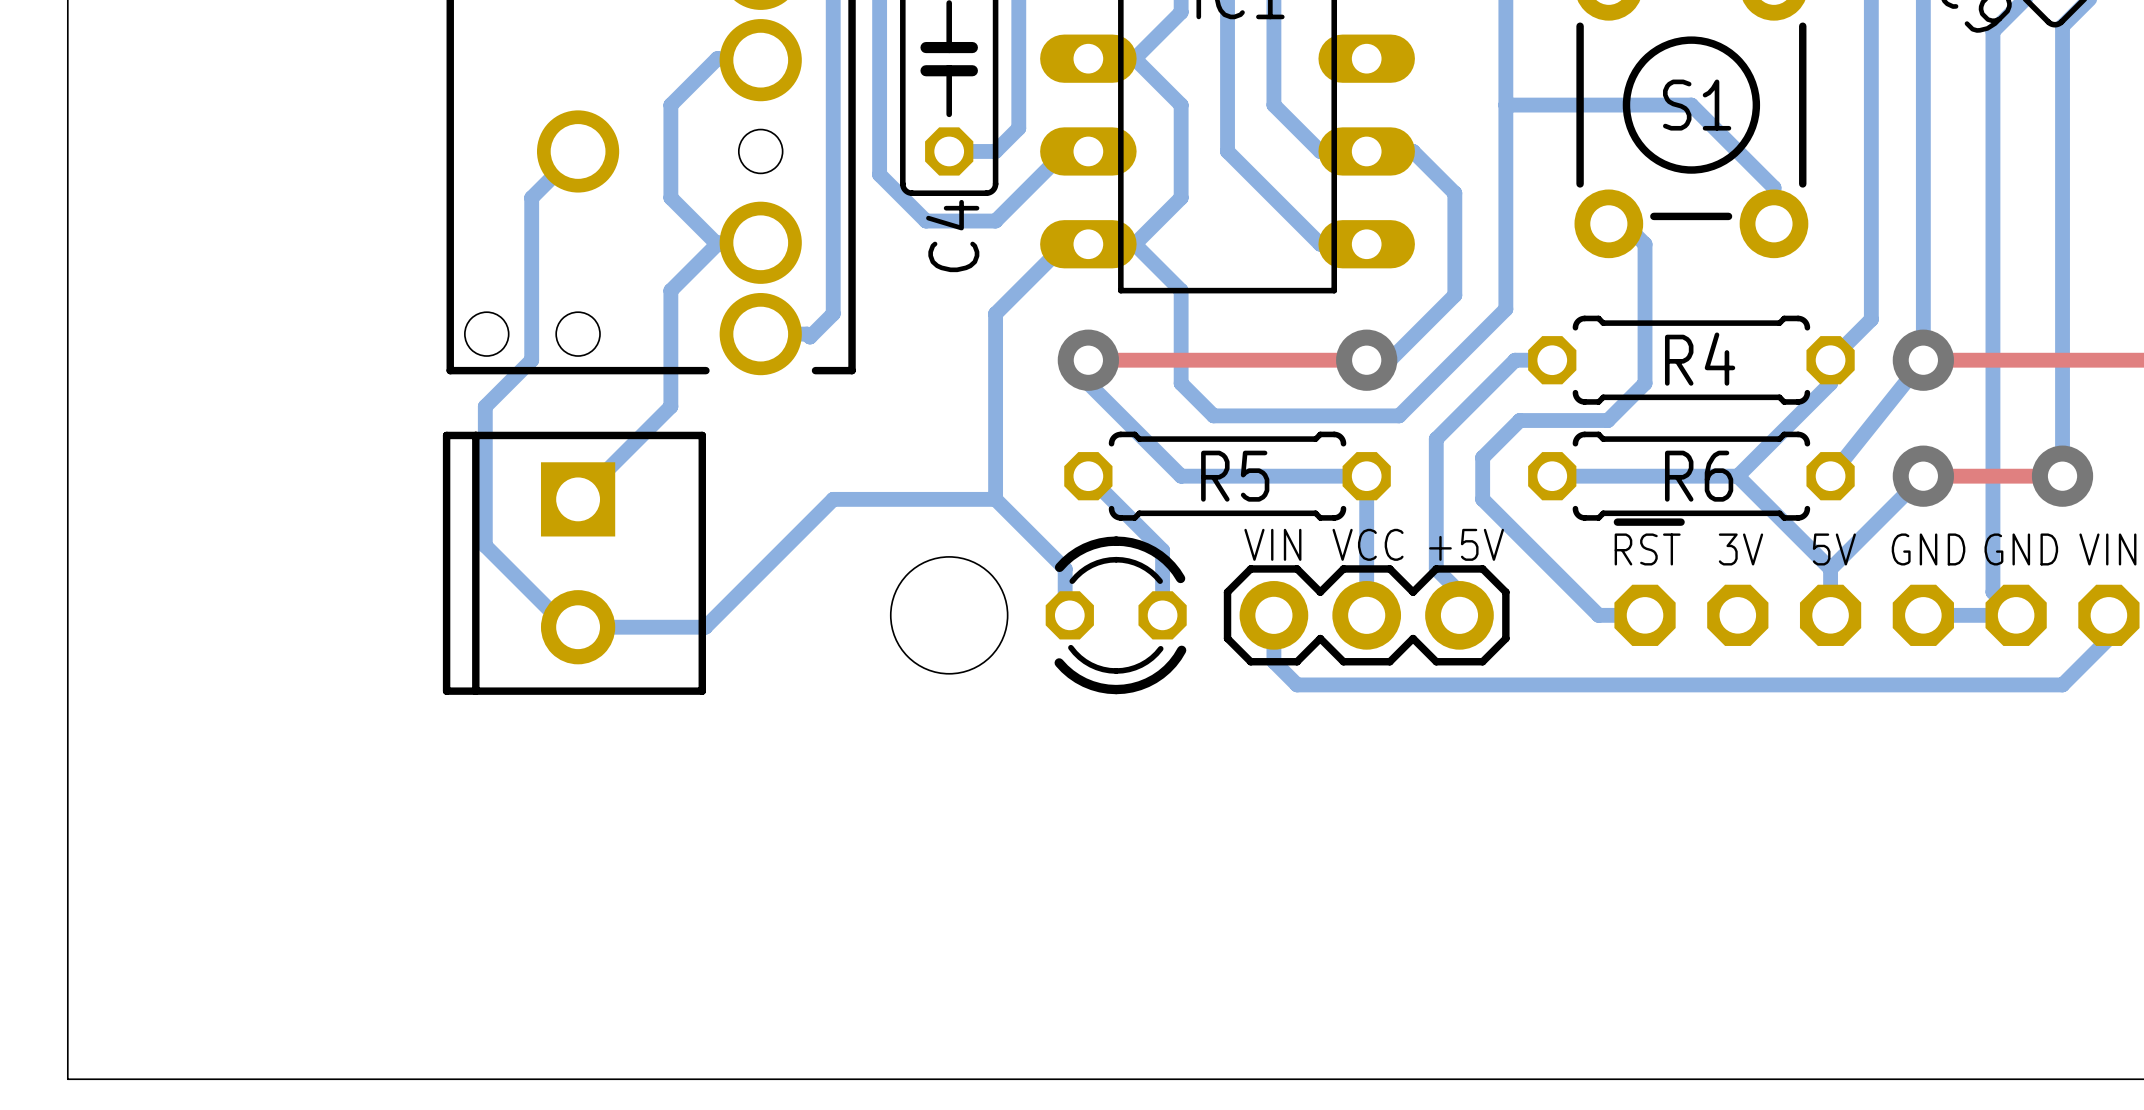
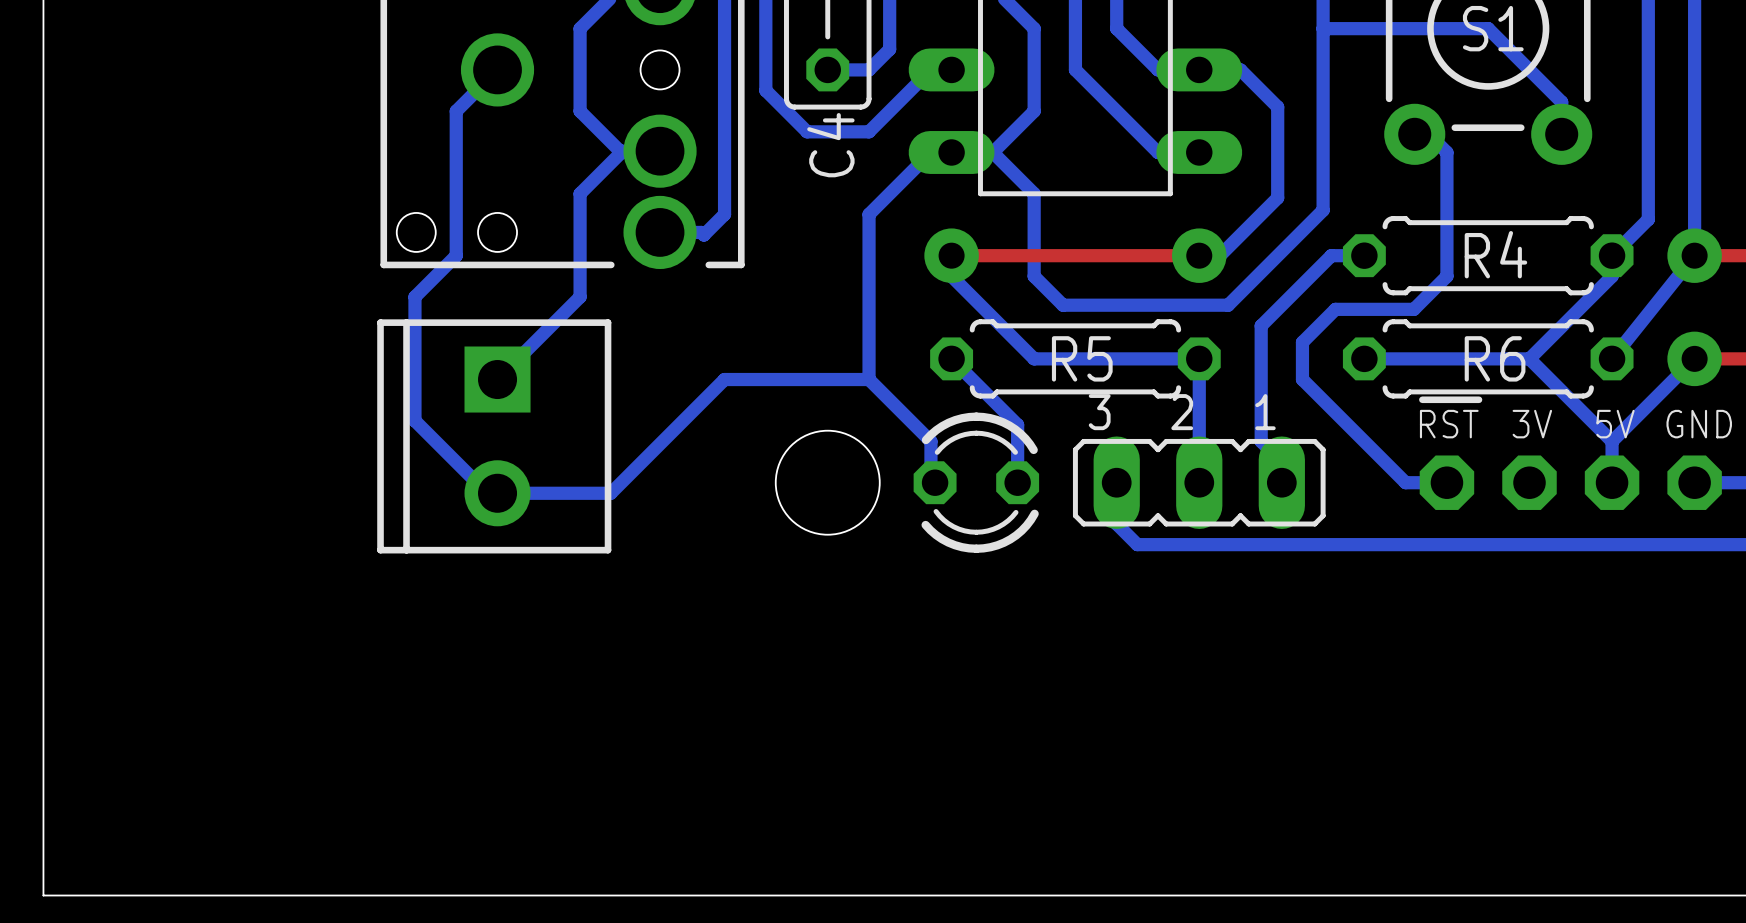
text: VIN (1272, 544) -> none
text: VCC (1368, 544) -> none
text: +5V (1466, 544) -> none
part footprint: [1223, 565, 1510, 666] -> [1072, 436, 1326, 529]

